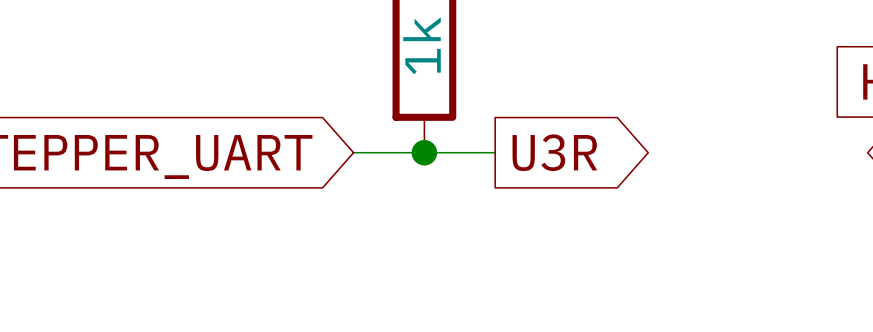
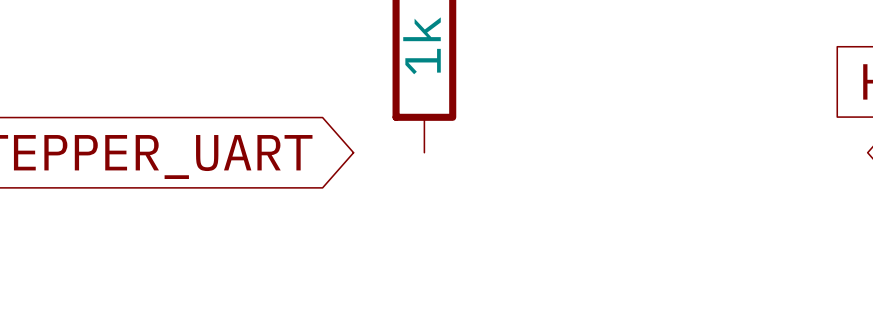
wire: (353, 152) (495, 152) -> none
junction: (424, 152) -> none
global label: U3R (554, 152) -> none

